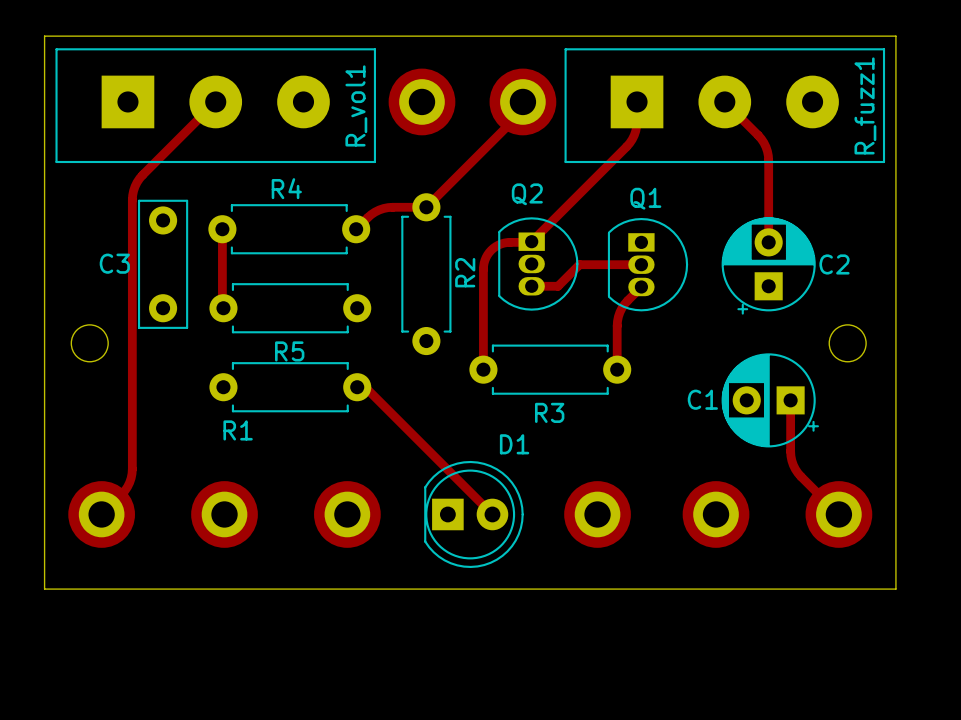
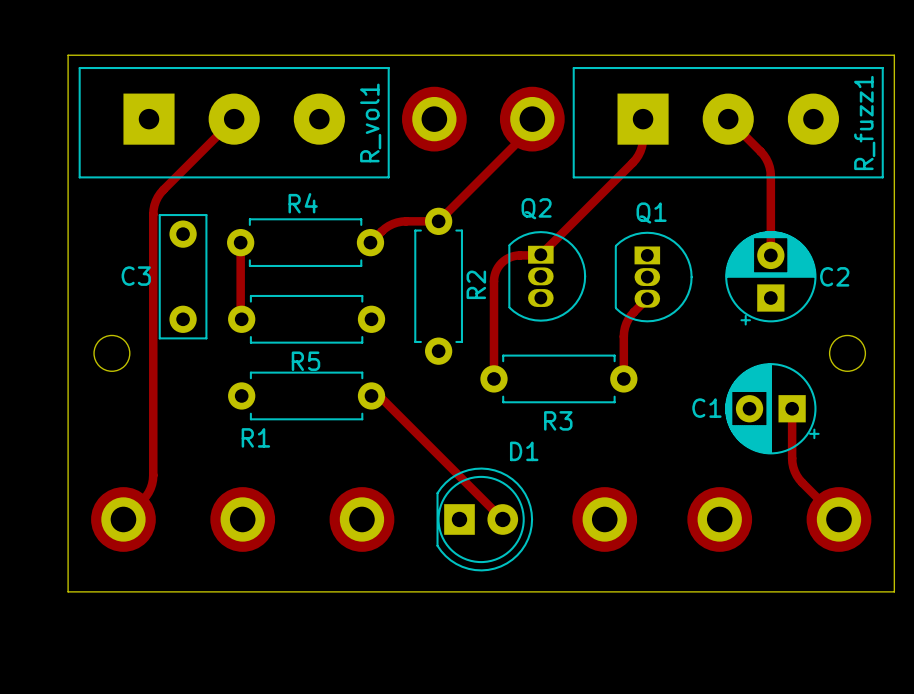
track: (641, 264) (579, 264) (558, 286) (531, 286) -> none

